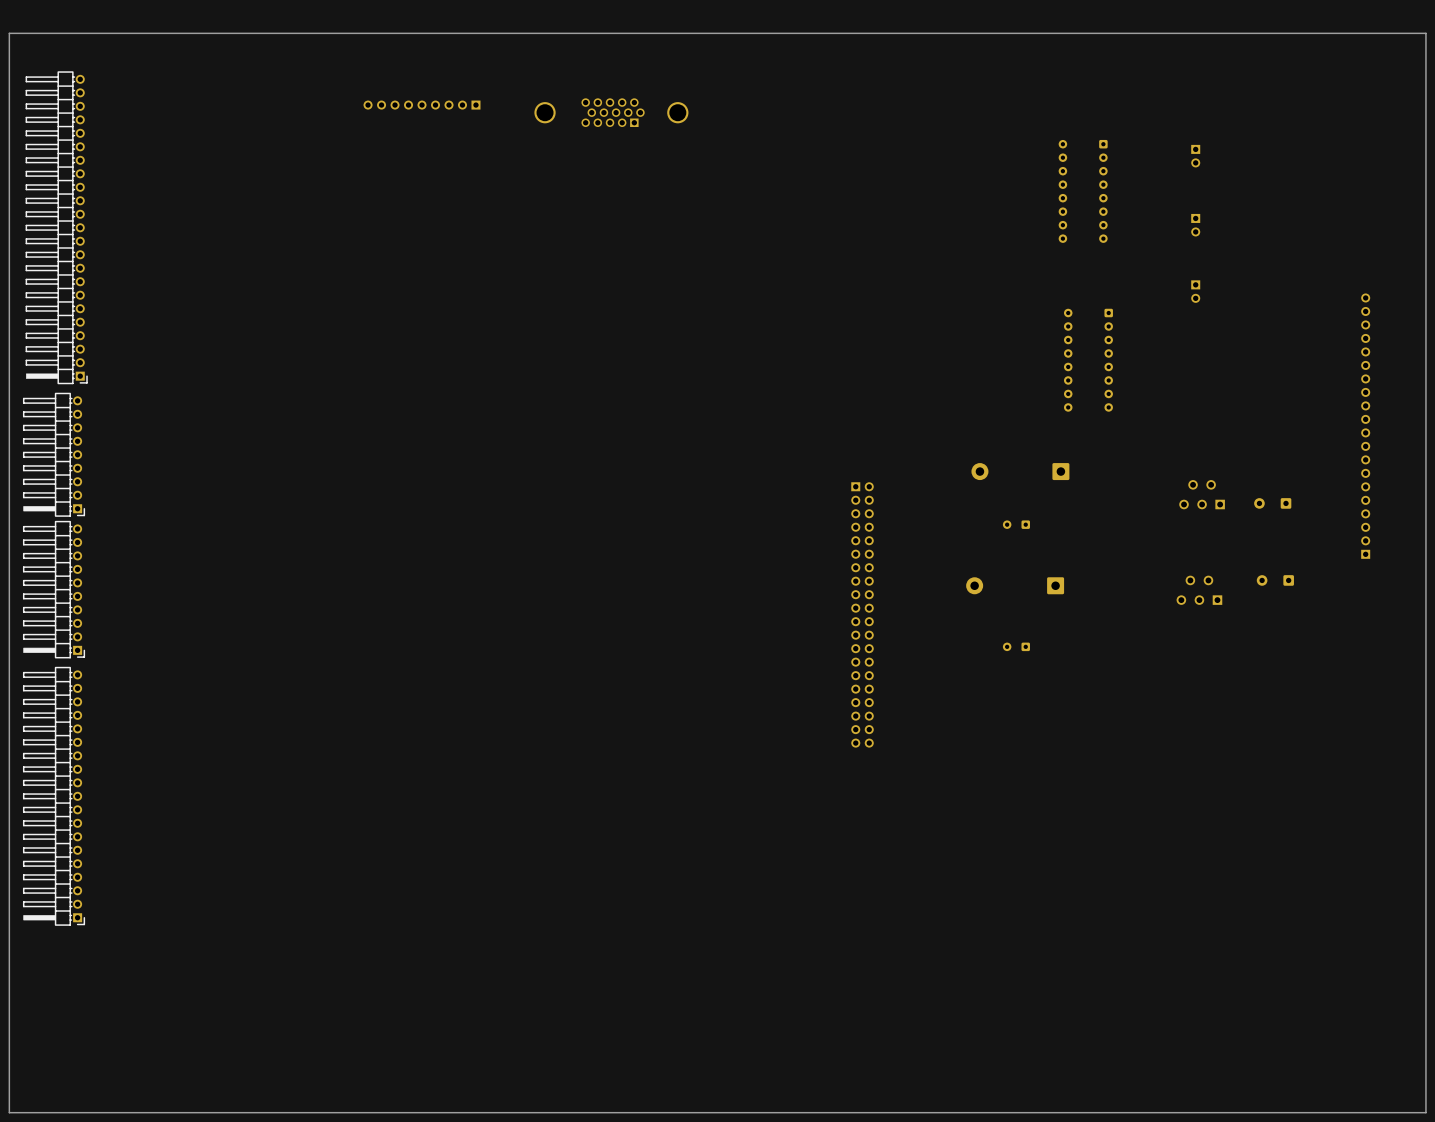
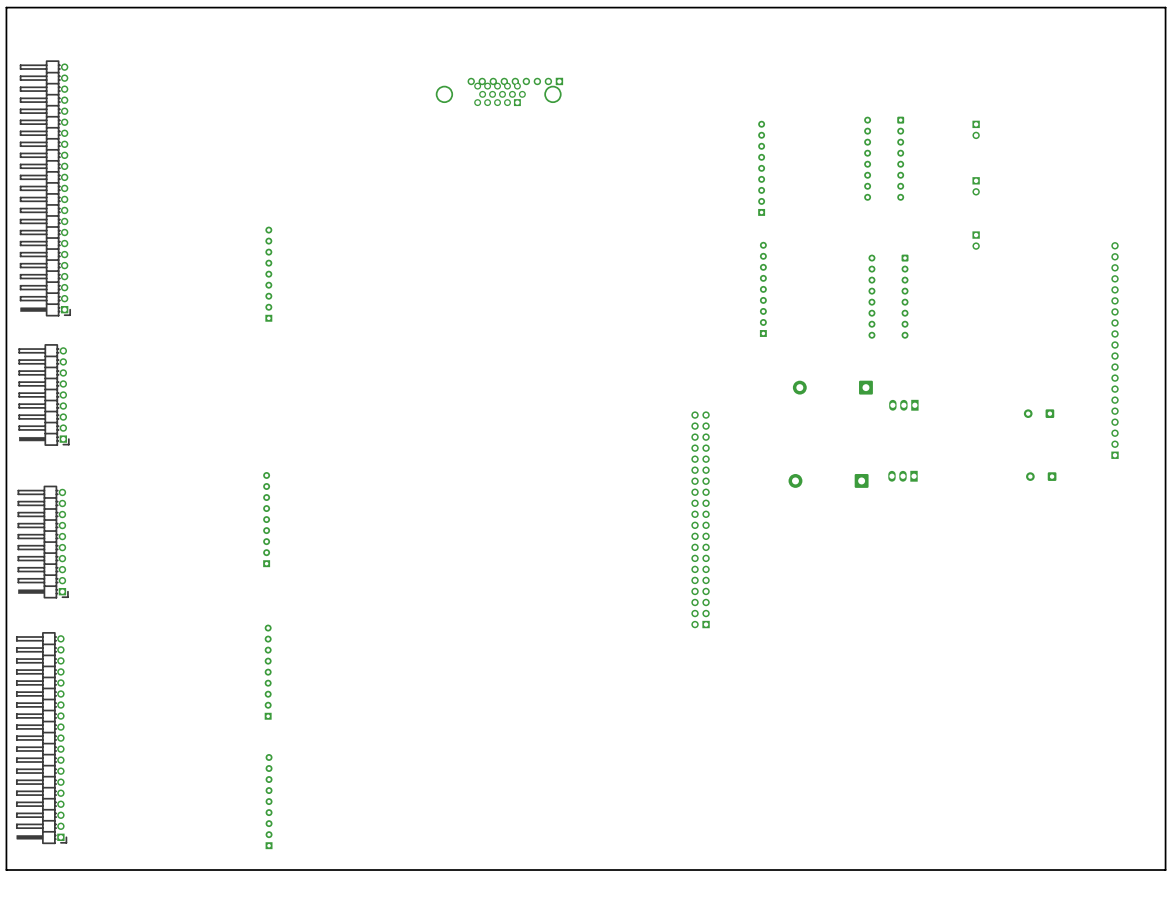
board edge: (1425, 33) (9, 33) (9, 1112) (1425, 1112) (1425, 33) -> (1165, 7) (1165, 870) (6, 870) (6, 7) (1165, 7)
part: none -> (515, 81)
part: (422, 105) -> none
part: none -> (761, 168)
part: none -> (268, 274)
part: none -> (763, 289)
part position: (54, 454) -> (44, 395)
part: none -> (903, 405)
part: (1202, 494) -> none
part: (1016, 524) -> none
part: none -> (902, 476)
part position: (54, 589) -> (43, 542)
part: (1199, 590) -> none
part rotation: 0° (862, 614) -> 180° (700, 519)
part: none -> (266, 519)
part: (1016, 646) -> none
part position: (54, 796) -> (41, 738)
part: none -> (268, 672)
part: none -> (269, 801)

